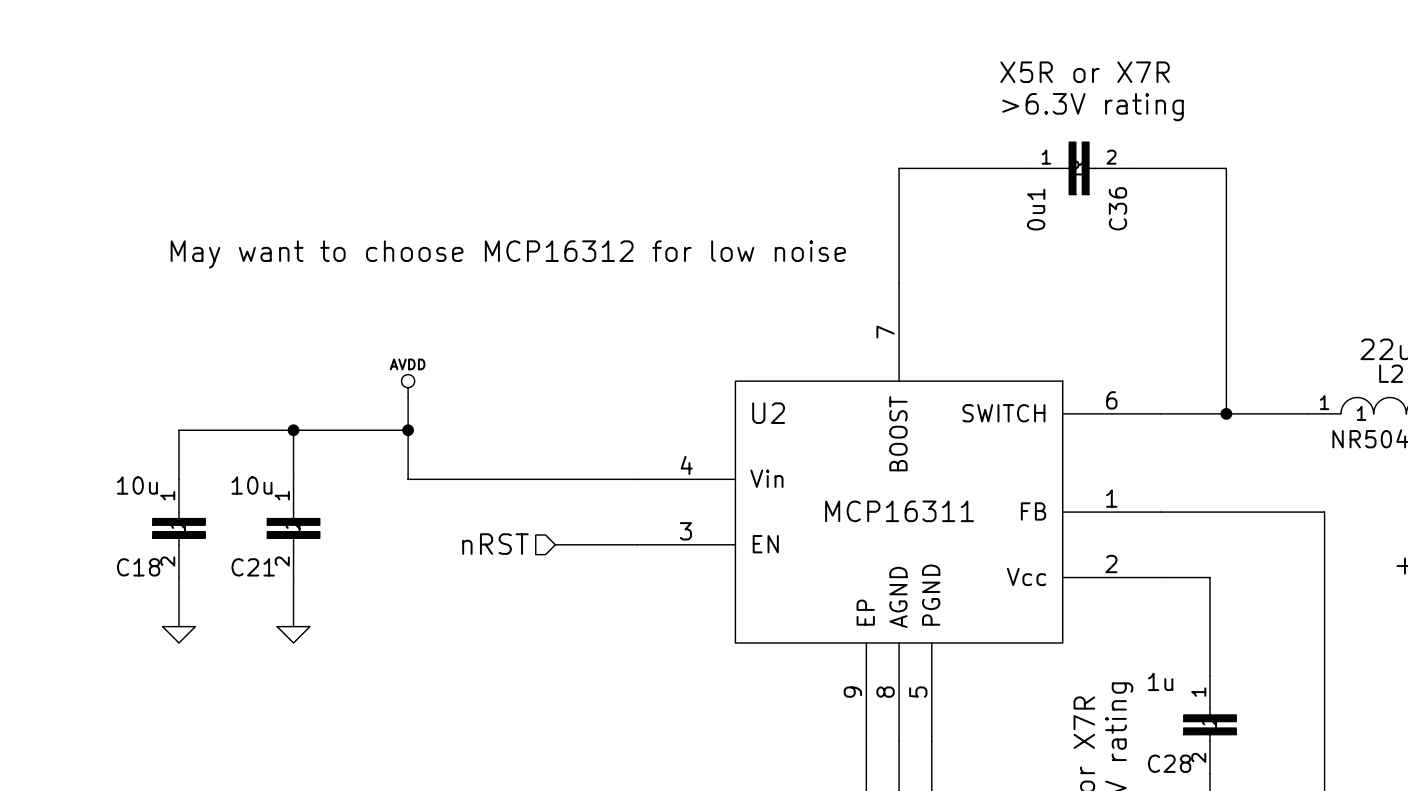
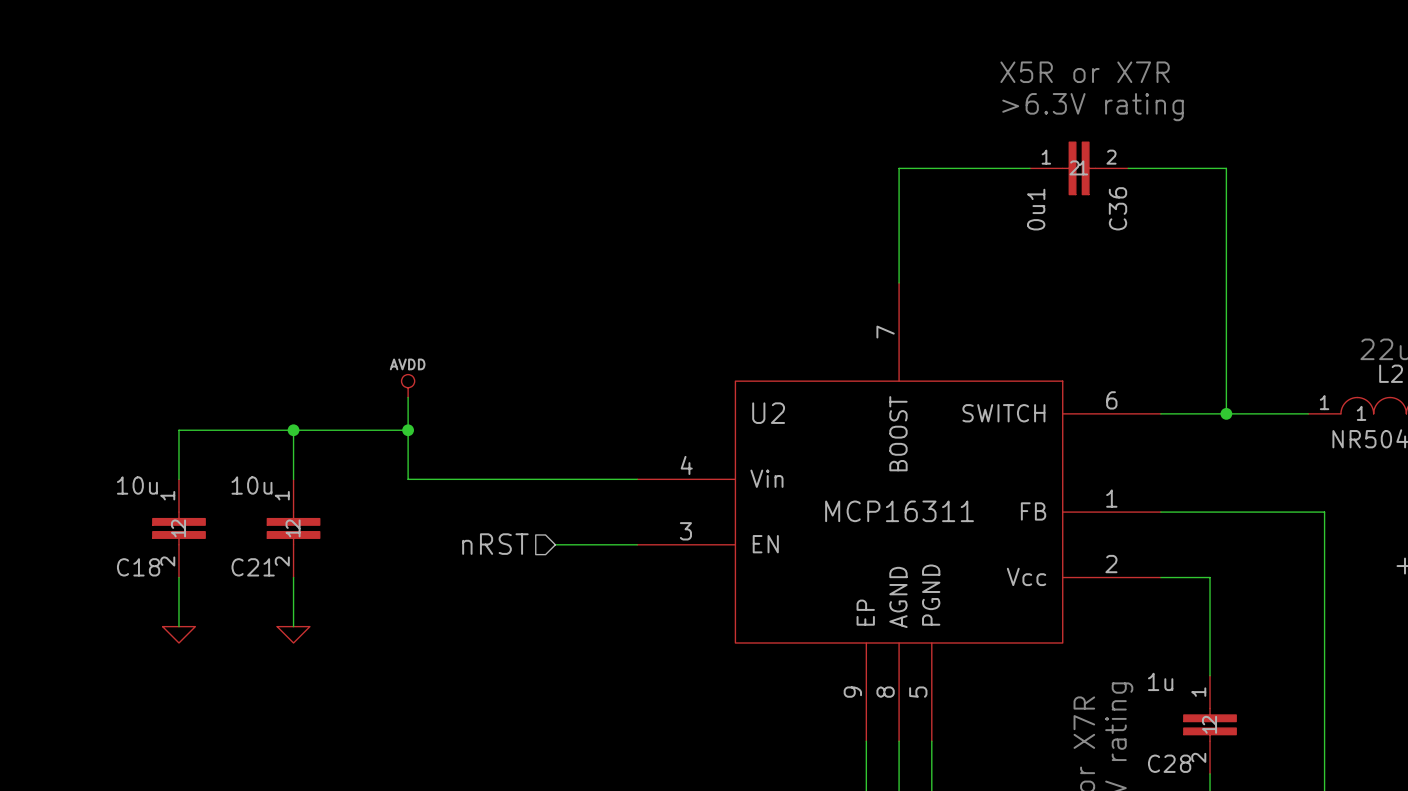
text: May want to choose MCP16312 for low noise (508, 254) -> none

